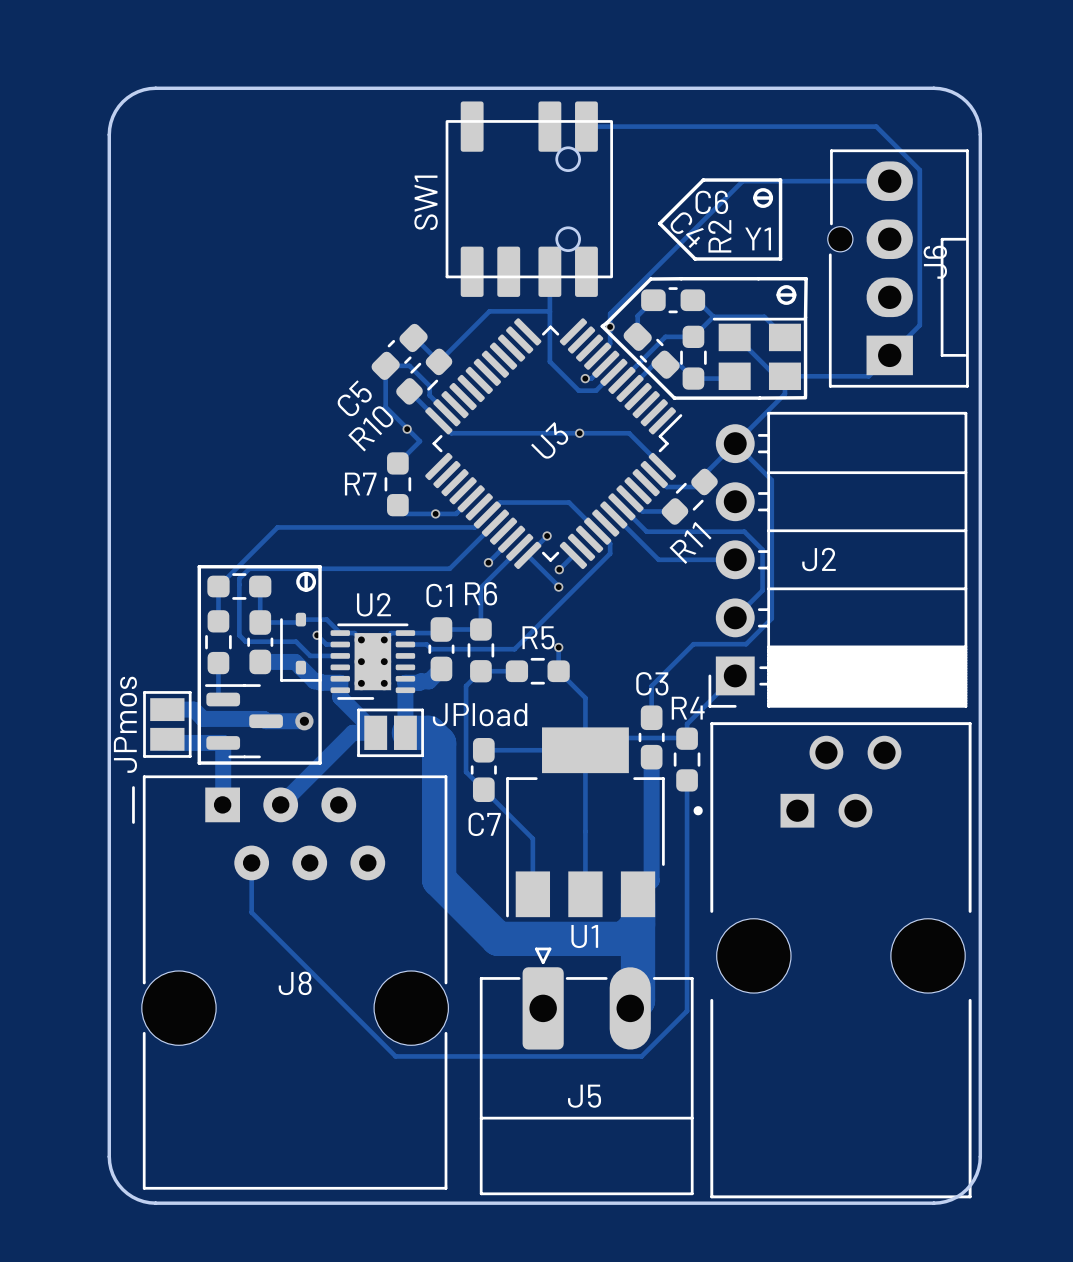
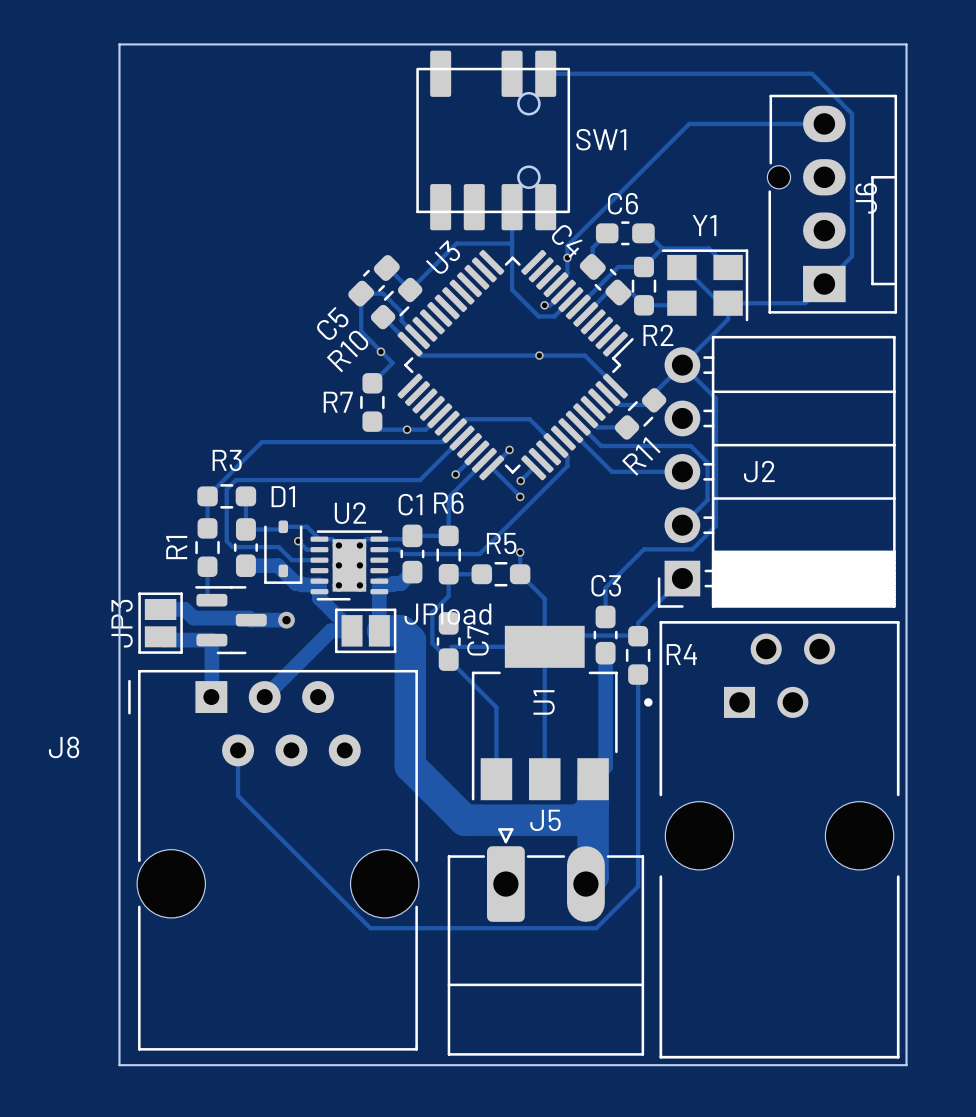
board edge: (155, 88) (933, 88) (945, 89) (957, 94) (970, 106) (976, 116) (980, 134) (980, 1156) (978, 1168) (974, 1179) (962, 1193) (951, 1199) (933, 1203) (155, 1203) (137, 1199) (127, 1193) (118, 1185) (112, 1174) (109, 1156) (109, 134) (112, 116) (122, 101) (137, 91) (155, 88) -> (119, 44) (119, 1065) (906, 1065) (906, 44) (119, 44)
line: (703, 180) (780, 180) (780, 258) (695, 258) (659, 223) (703, 180) -> none
drawing: [753, 188, 774, 208] -> none
line: (754, 198) (771, 198) -> none
SW1 name rotation: 0° (426, 202) -> 90° clockwise (601, 139)
SW1 name position: SW1 (426, 202) -> SW1 (601, 139)
C6 name position: C6 (711, 202) -> C6 (622, 203)
C4 name position: C4 (687, 230) -> C4 (567, 241)
R2 name rotation: 0° (719, 236) -> 90° clockwise (658, 335)
R2 name position: R2 (719, 236) -> R2 (658, 335)
Y1 name position: Y1 (758, 238) -> Y1 (704, 225)
drawing: [776, 285, 797, 305] -> none
line: (778, 295) (794, 295) -> none
line: (805, 396) (806, 278) (650, 279) (602, 326) (674, 398) (805, 397) -> none
U3 name position: U3 (549, 440) -> U3 (443, 257)
R3 name: none -> R3 (227, 460)
line: (199, 566) (320, 566) (320, 763) (199, 763) (199, 566) -> none
drawing: [296, 571, 317, 592] -> none
line: (306, 573) (306, 590) -> none
D1 name: none -> D1 (283, 496)
R1 name: none -> R1 (176, 547)
track: (480, 671) (466, 686) (466, 771) (532, 838) -> (448, 574) (448, 596) (432, 612) (432, 643) (496, 707) (496, 728)
R4 name position: R4 (688, 708) -> R4 (681, 654)
JPmos name: JPmos (125, 724) -> JP3 (122, 623)
C7 position: (483, 770) -> (448, 641)
C7 name rotation: 0° (484, 824) -> 90° counterclockwise (477, 640)
C7 name position: C7 (484, 824) -> C7 (477, 640)
U1 name rotation: 0° (584, 936) -> 90° counterclockwise (544, 702)
U1 name position: U1 (584, 936) -> U1 (544, 702)
J8 name position: J8 (295, 983) -> J8 (64, 747)
J5 name position: J5 (584, 1096) -> J5 (545, 820)

